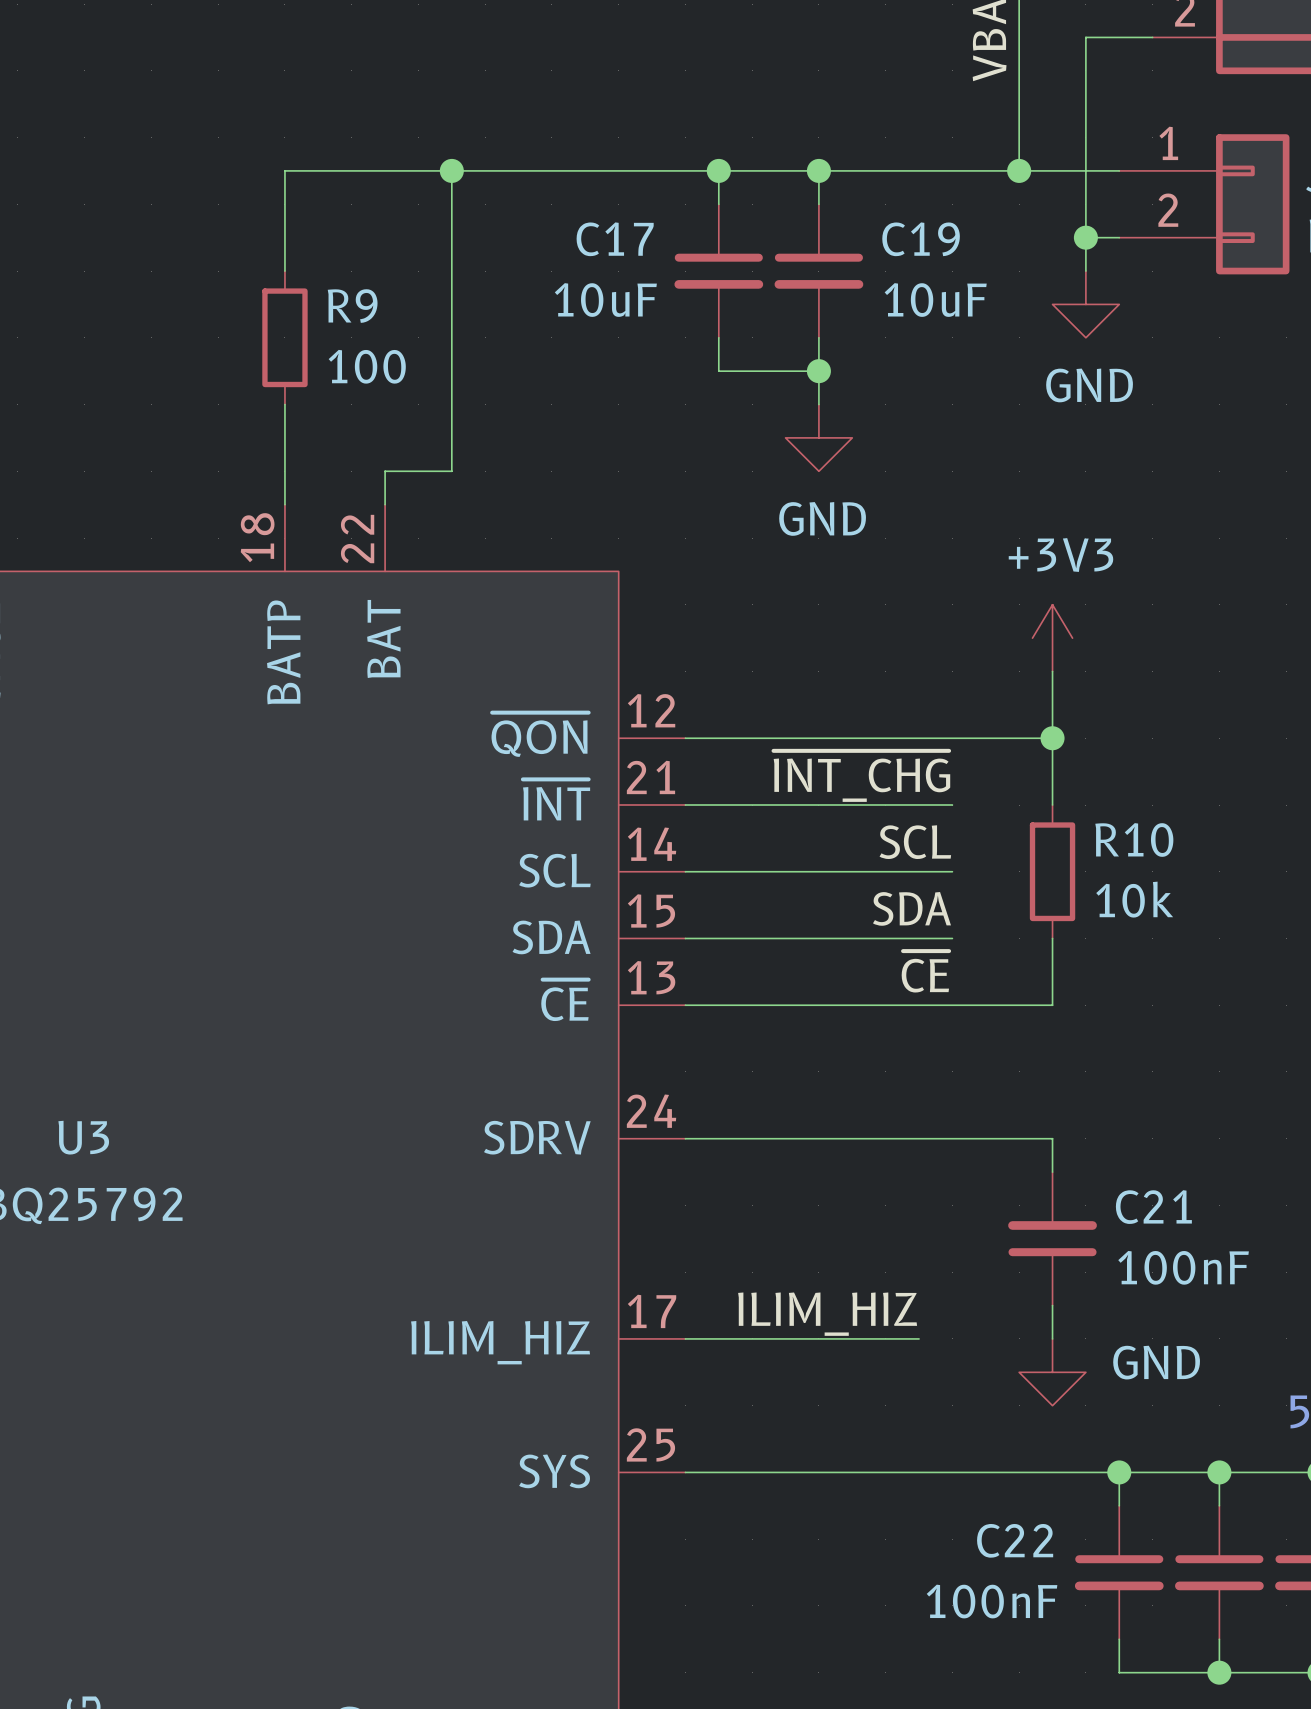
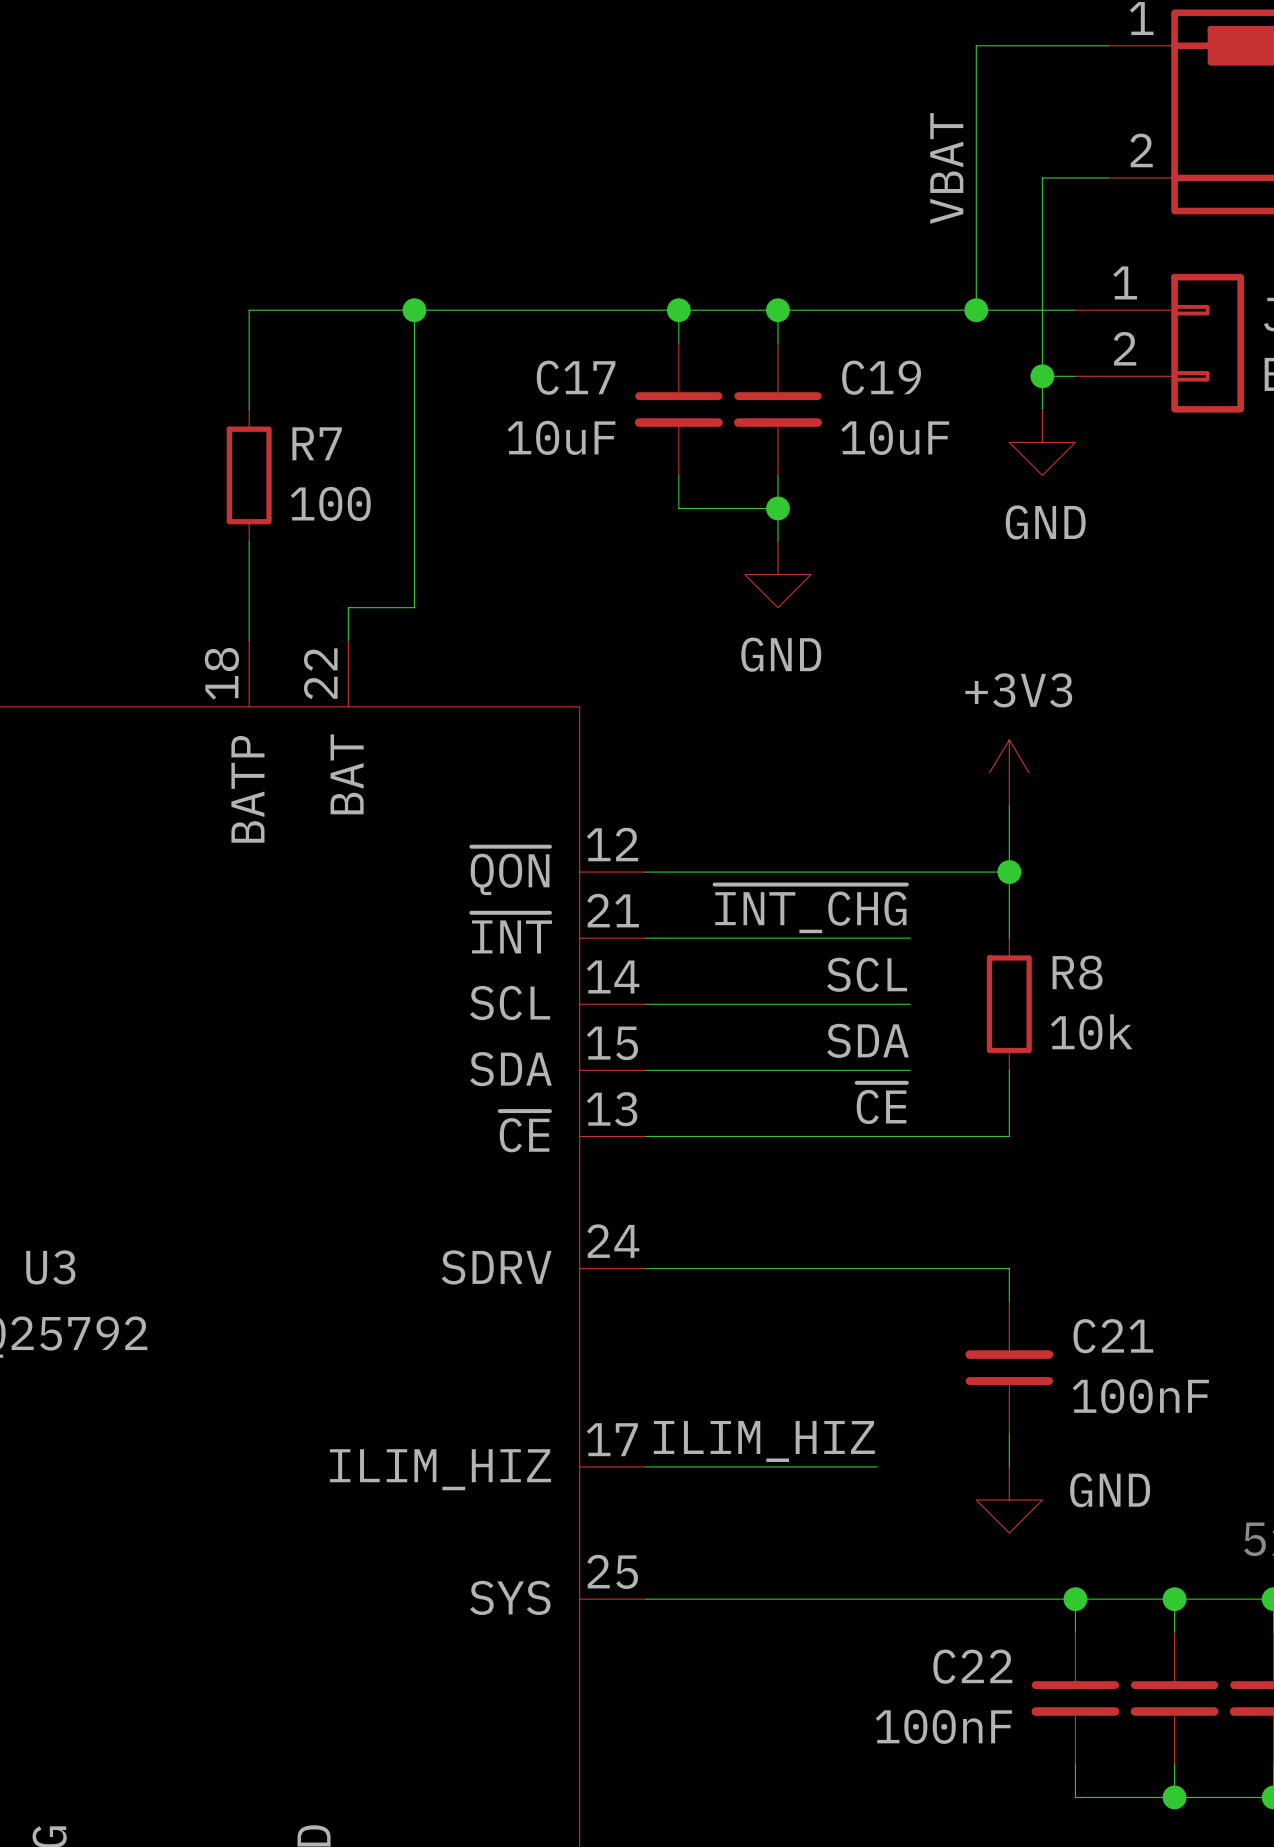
R9 name: R9 (352, 306) -> R7 (317, 443)
R10 name: R10 (1134, 839) -> R8 (1077, 972)

